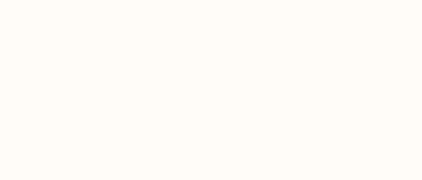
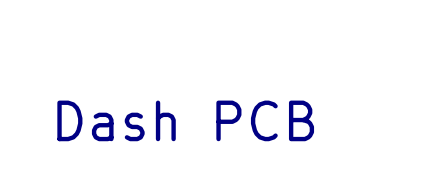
text: none -> Dash PCB (185, 120)

